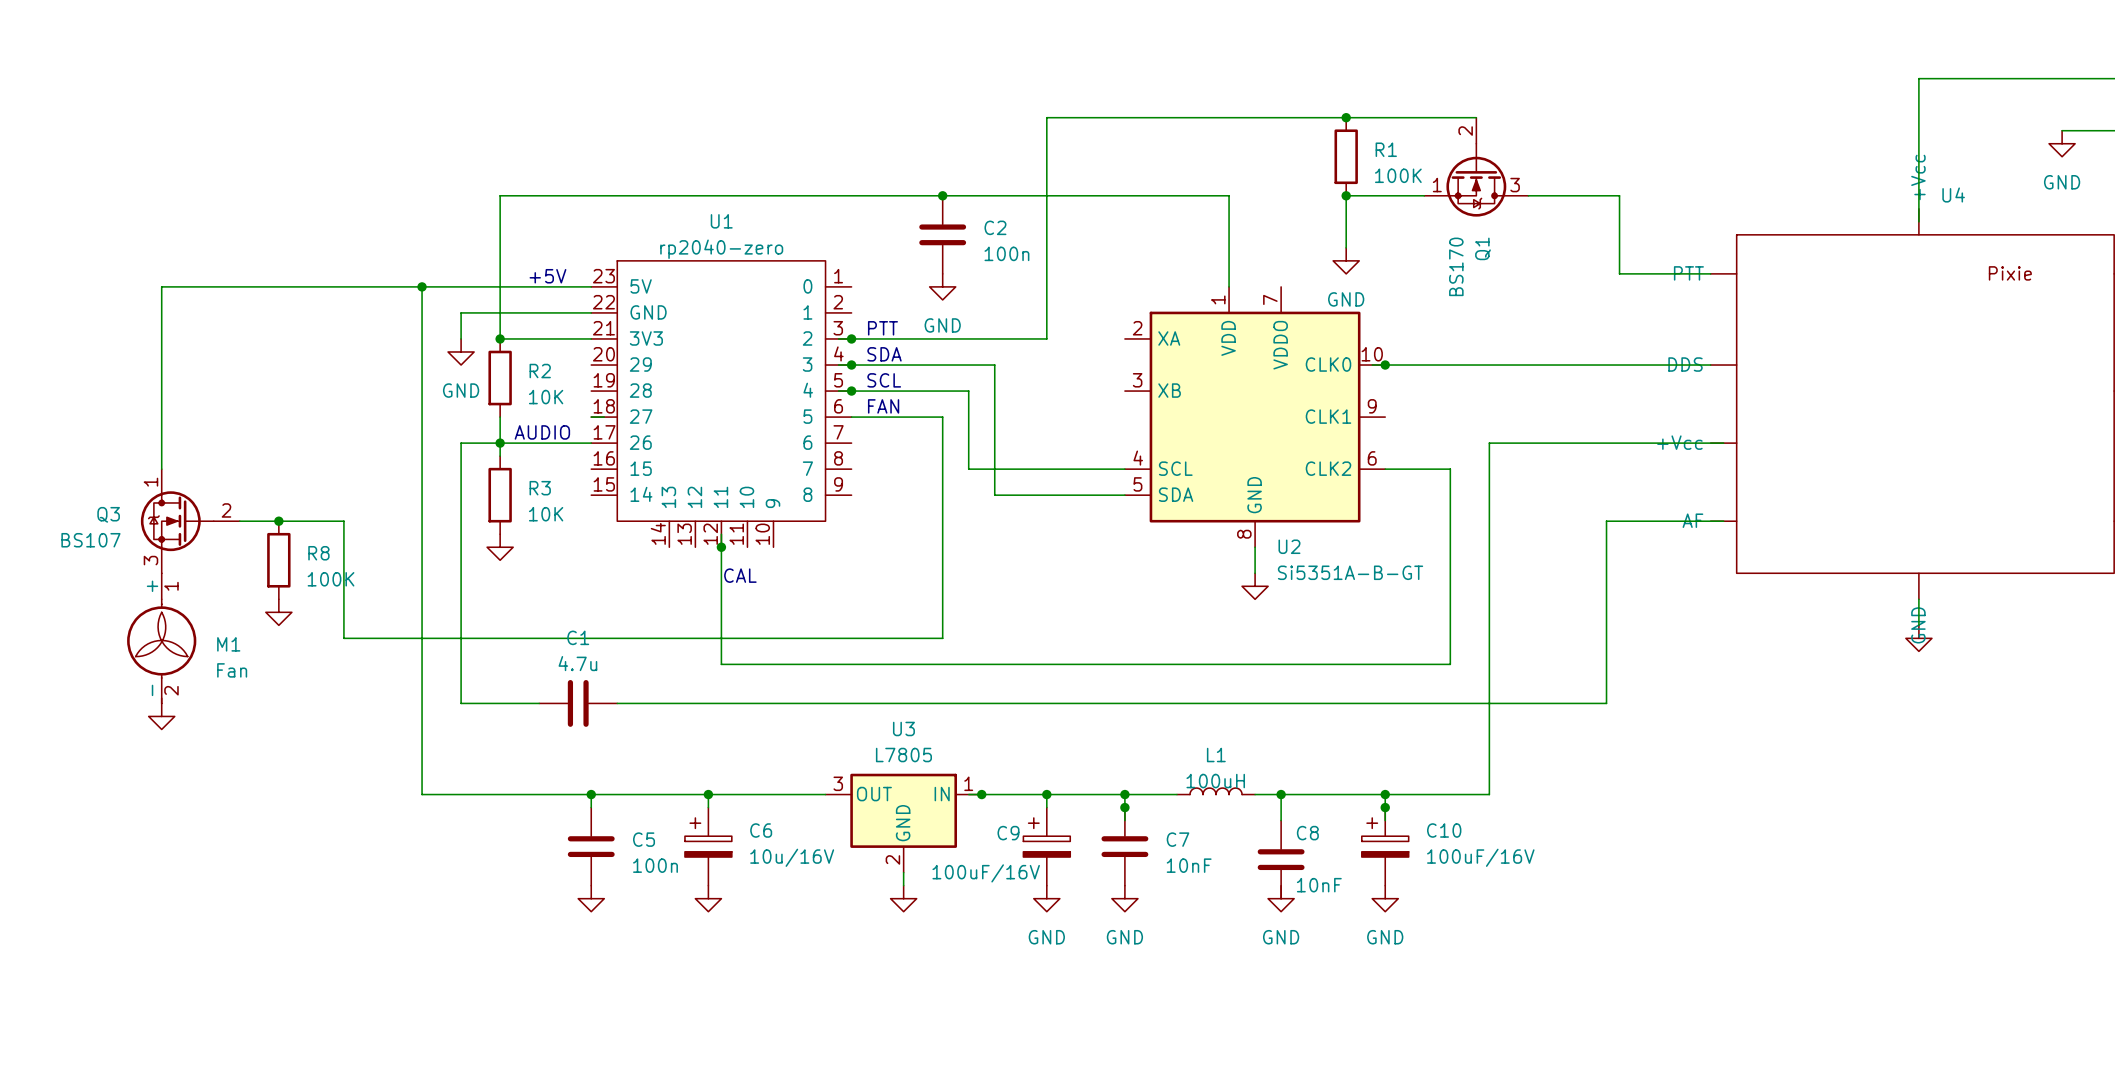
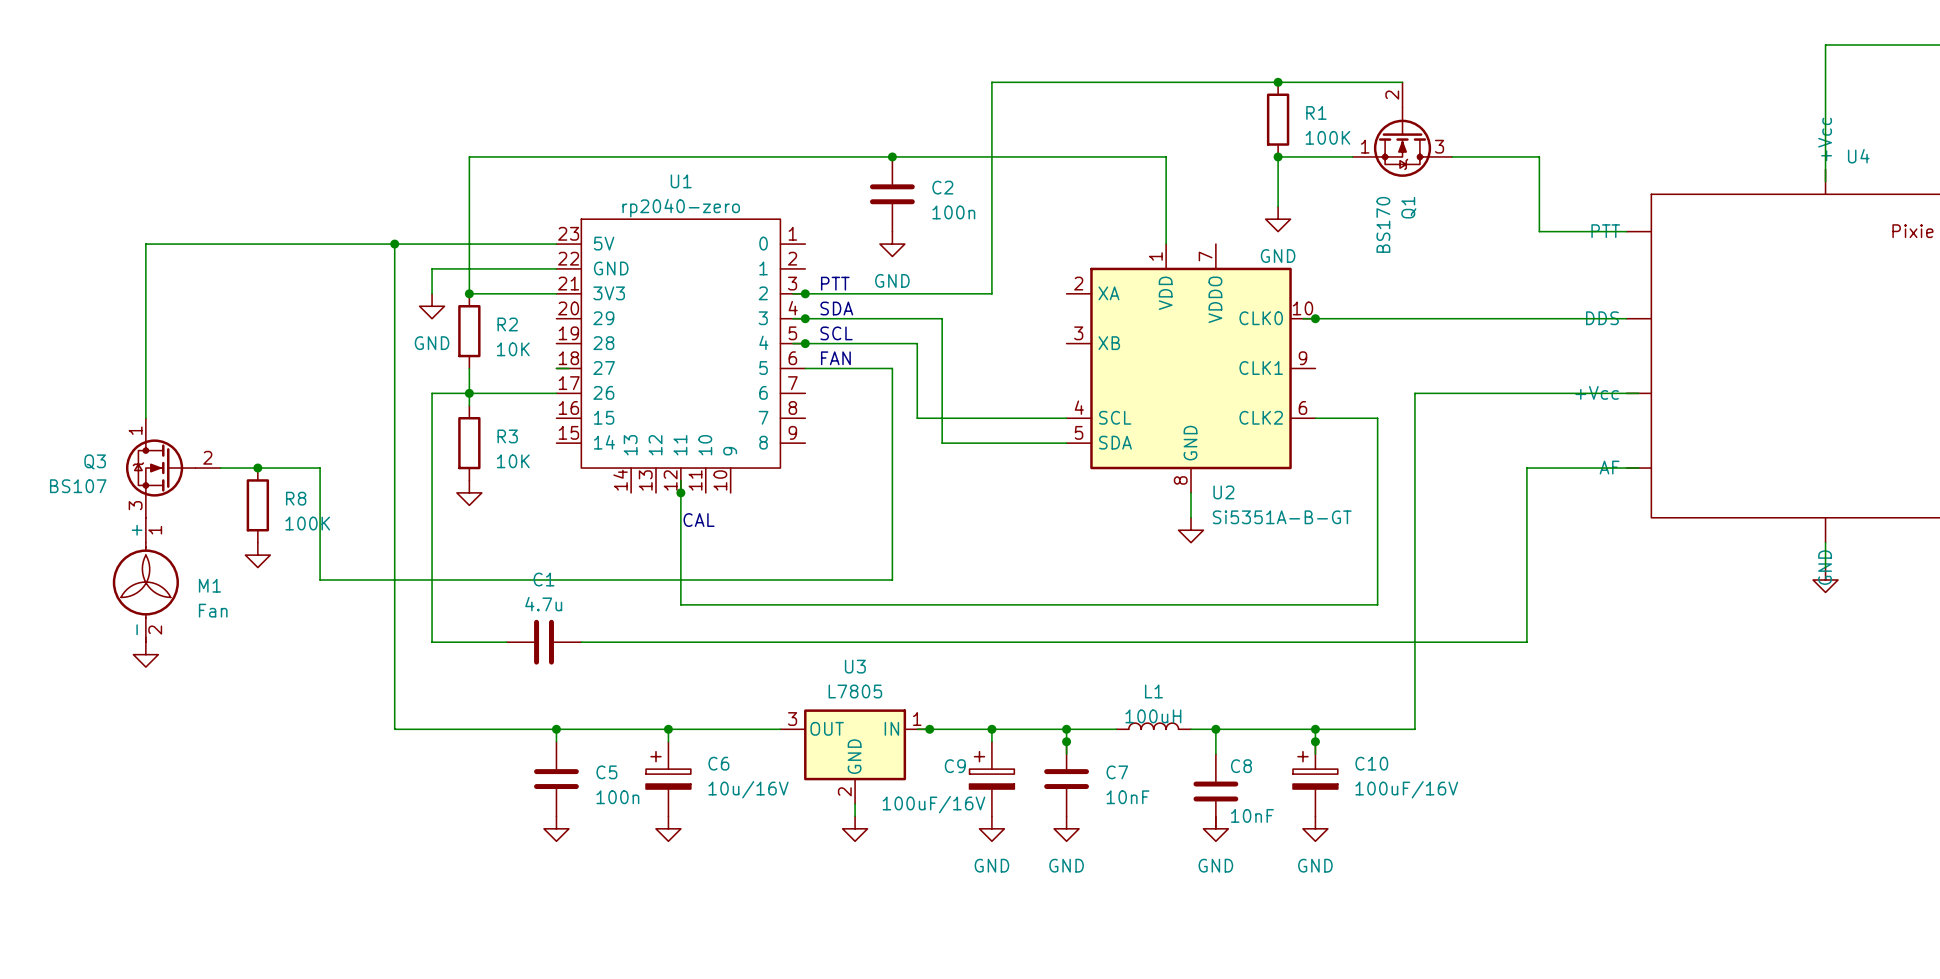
text: +5V (547, 276) -> none
text: AUDIO (542, 432) -> none

